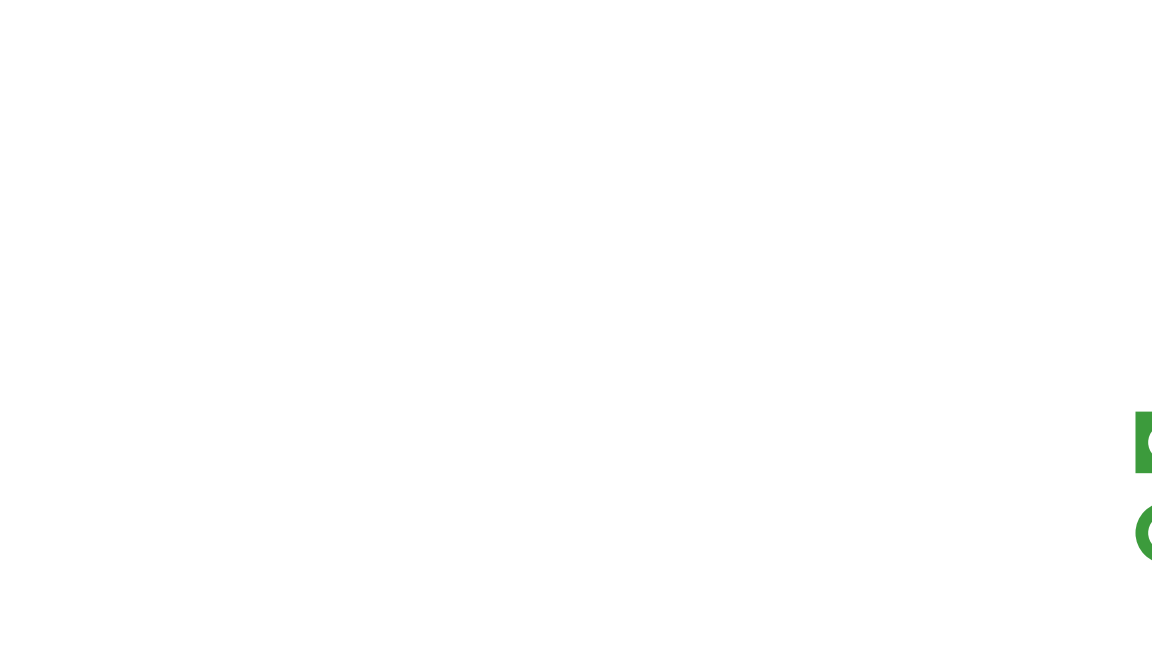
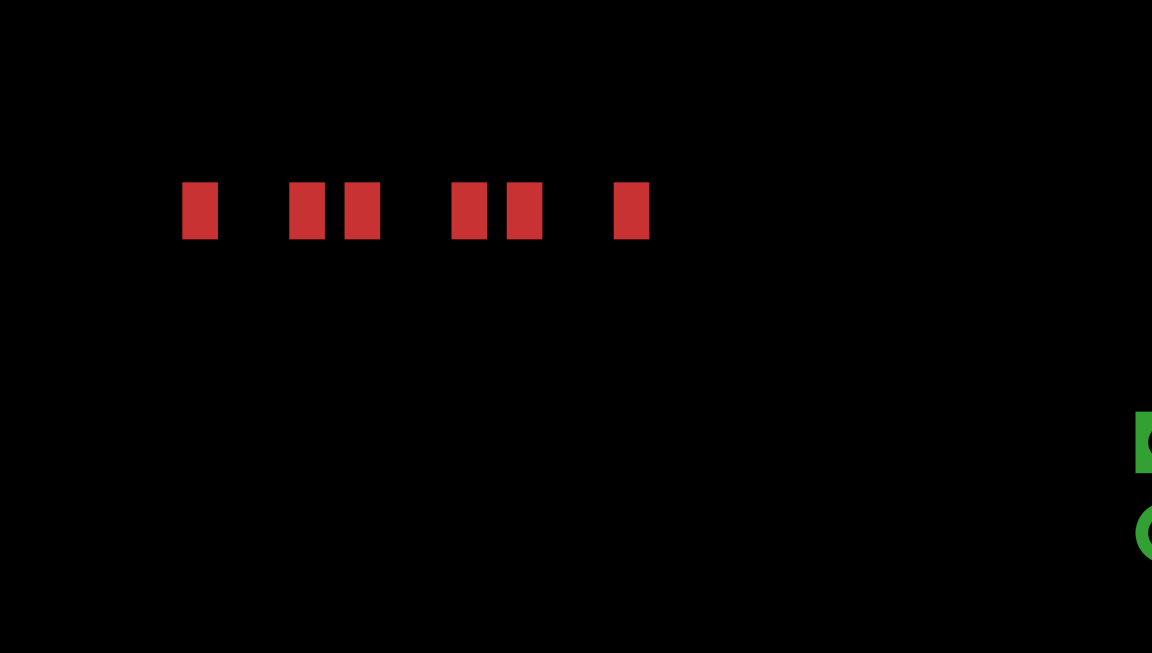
part: none -> (253, 210)
part: none -> (415, 210)
part: none -> (578, 210)

